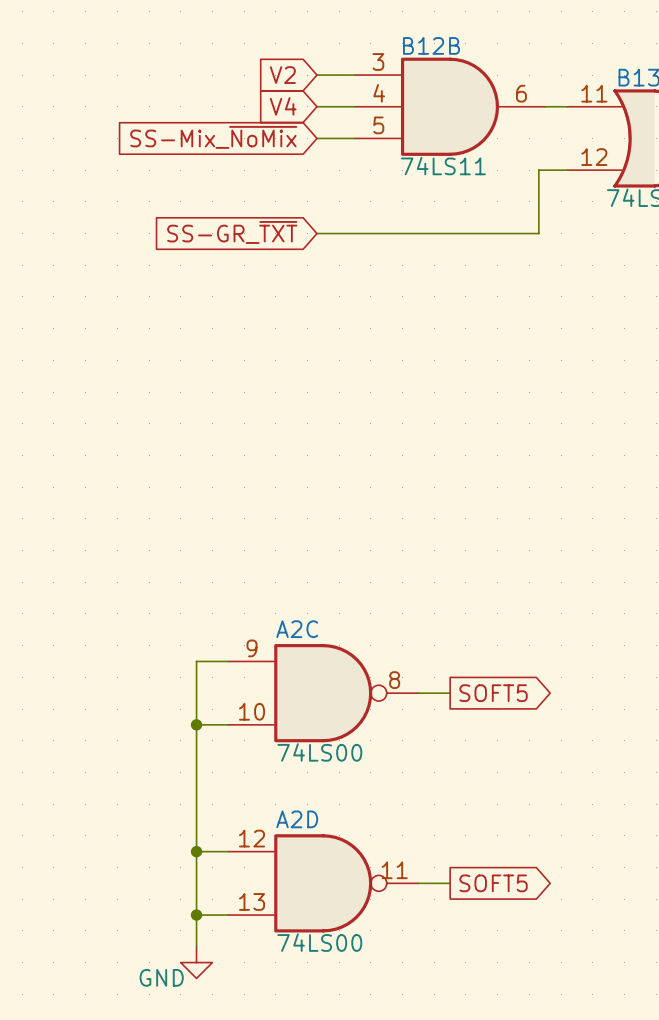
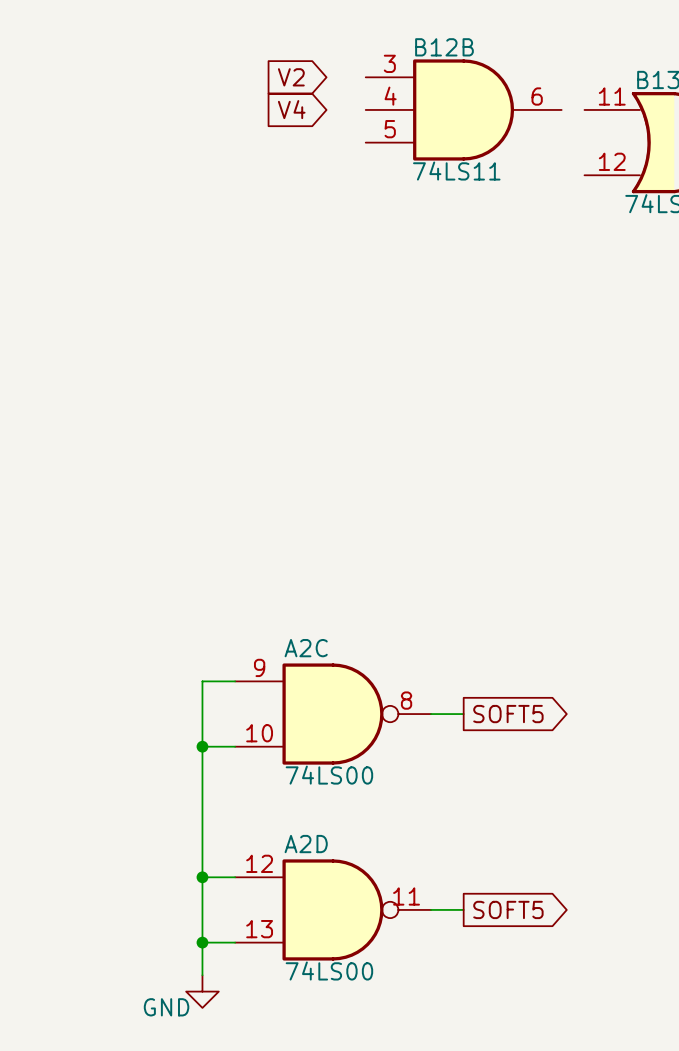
wire: (316, 75) (355, 75) -> none
wire: (316, 106) (355, 106) -> none
wire: (545, 106) (567, 106) -> none
global label: SS-Mix_~{NoMix} (213, 137) -> none
wire: (316, 138) (355, 138) -> none
wire: (567, 170) (538, 170) (538, 233) (316, 233) -> none
global label: SS-GR_~{TXT} (232, 232) -> none

